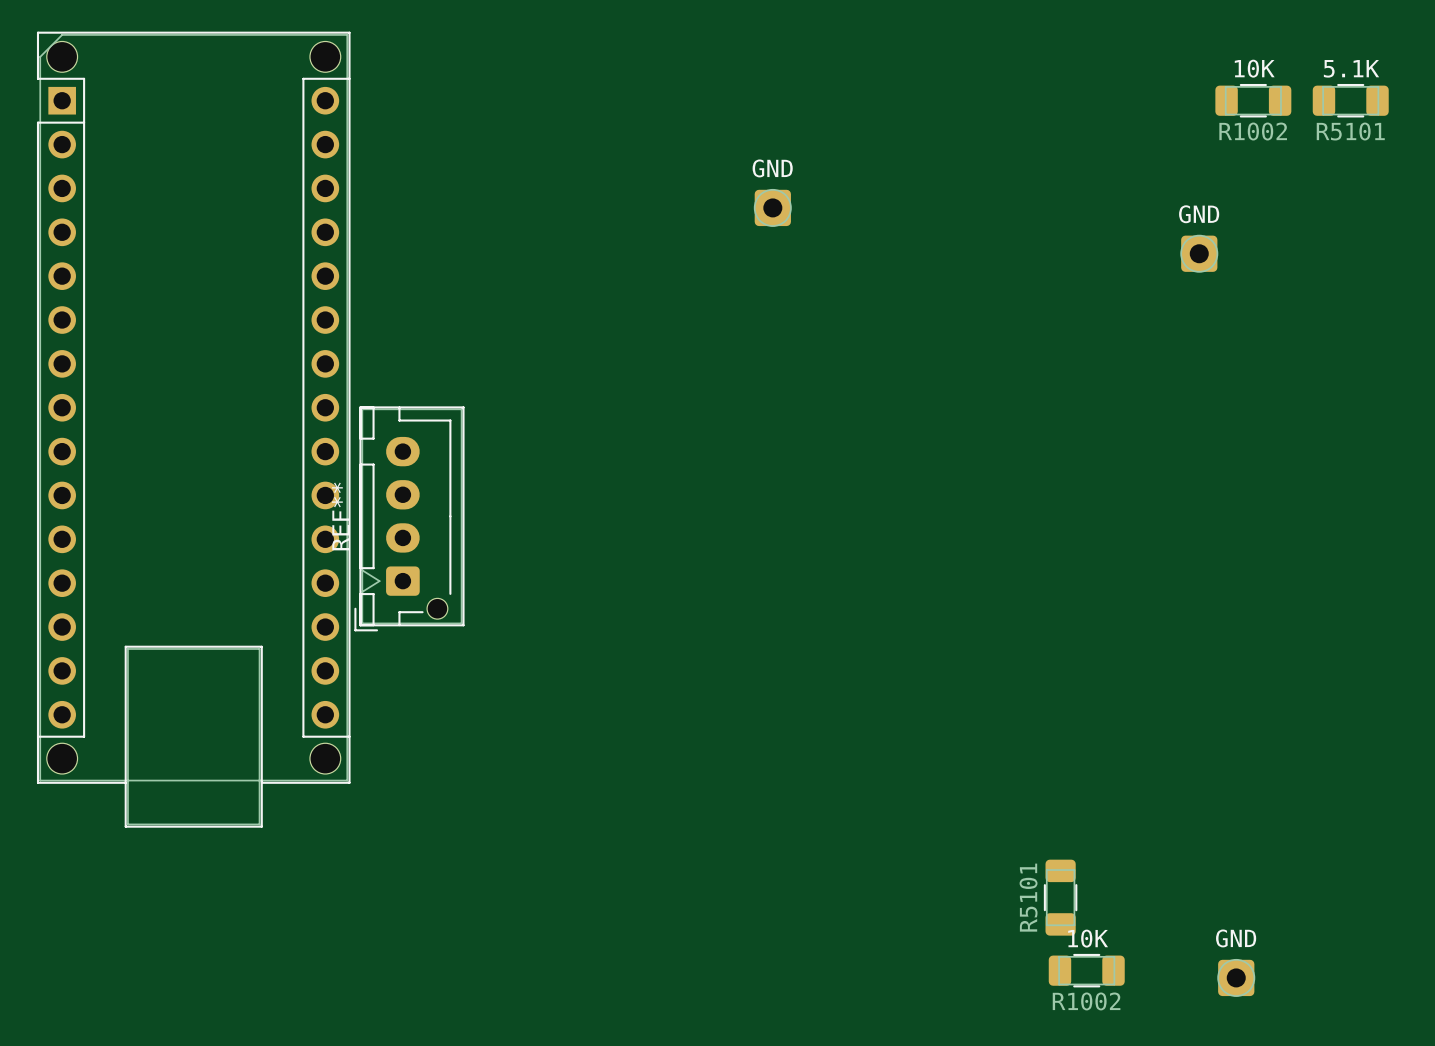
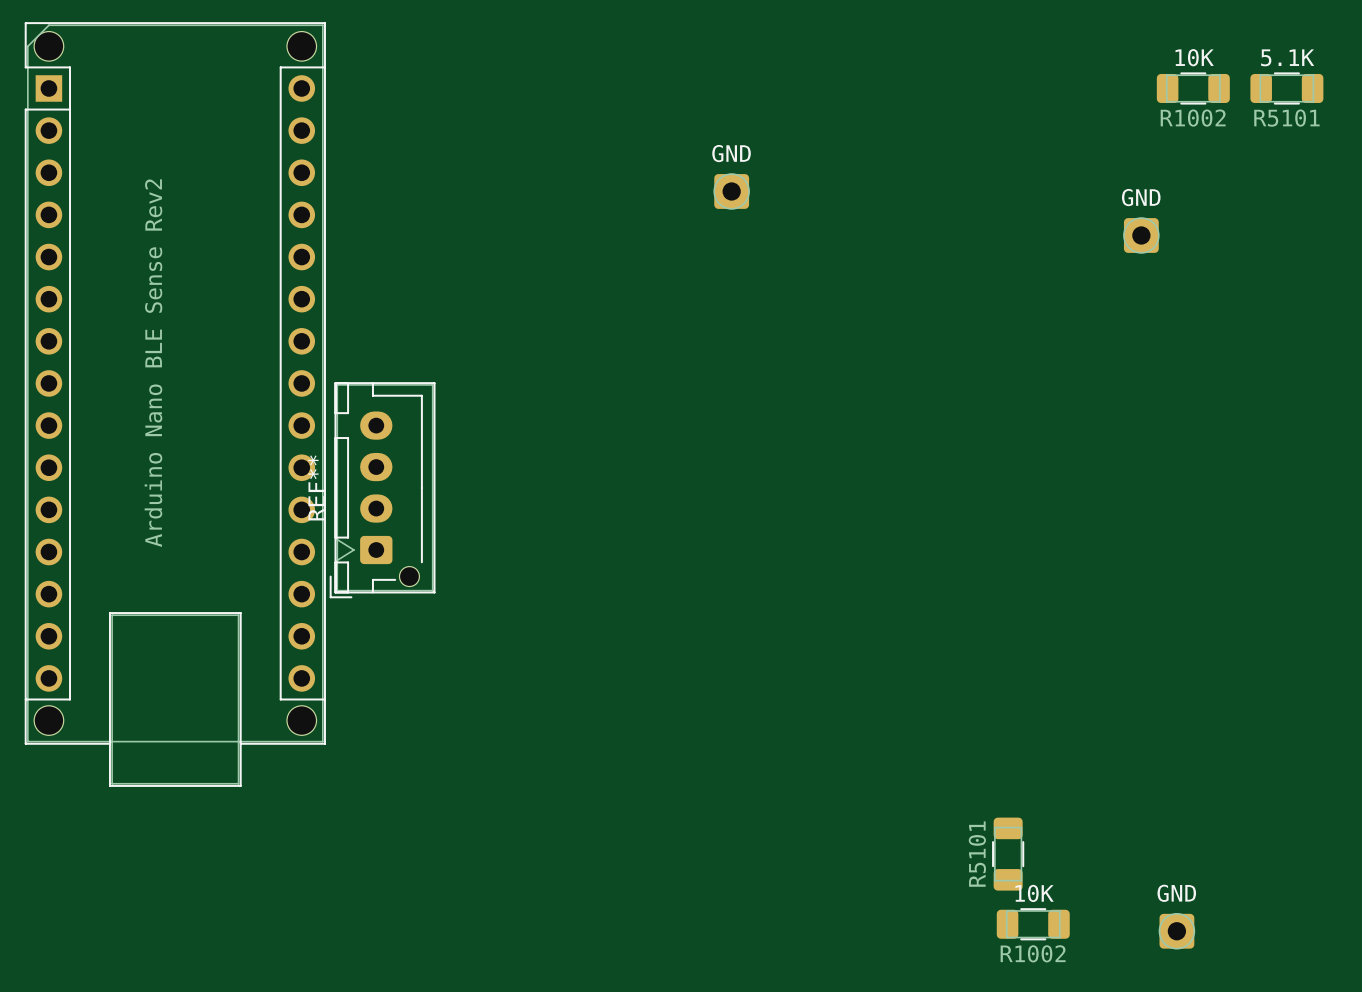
part text: none -> Arduino Nano BLE Sense Rev2 (153, 363)

